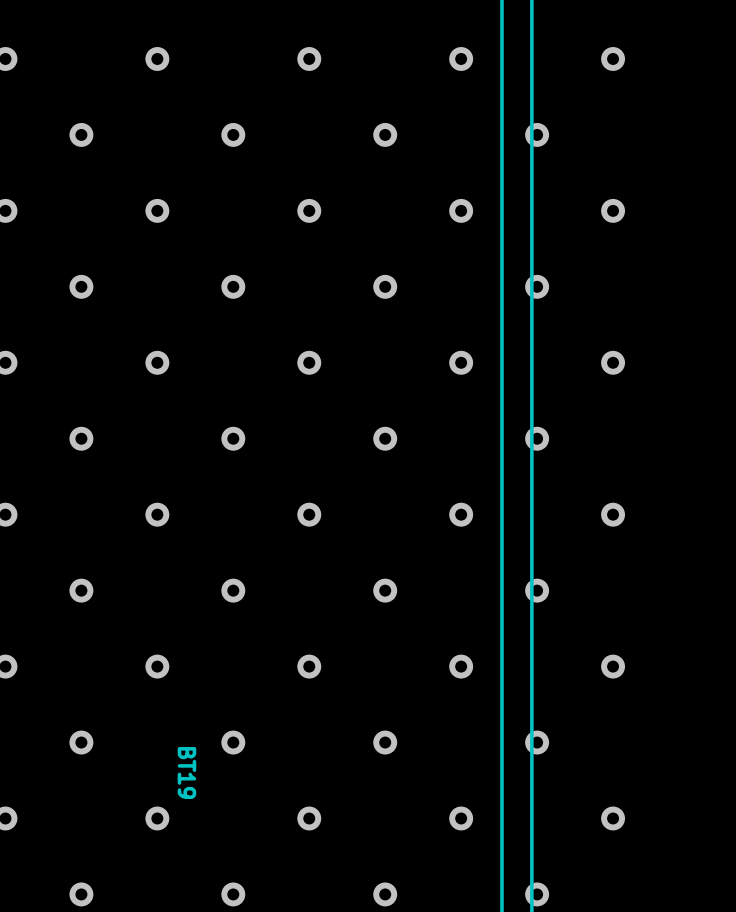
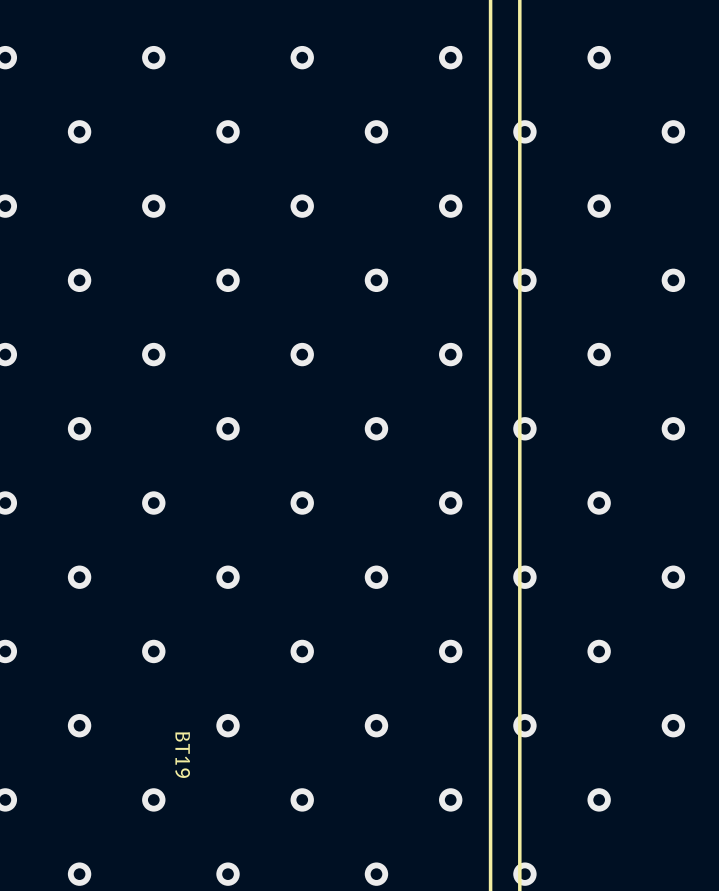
via: none -> (673, 131)
via: none -> (673, 280)
via: none -> (673, 428)
via: none -> (673, 577)
via: none -> (673, 725)

